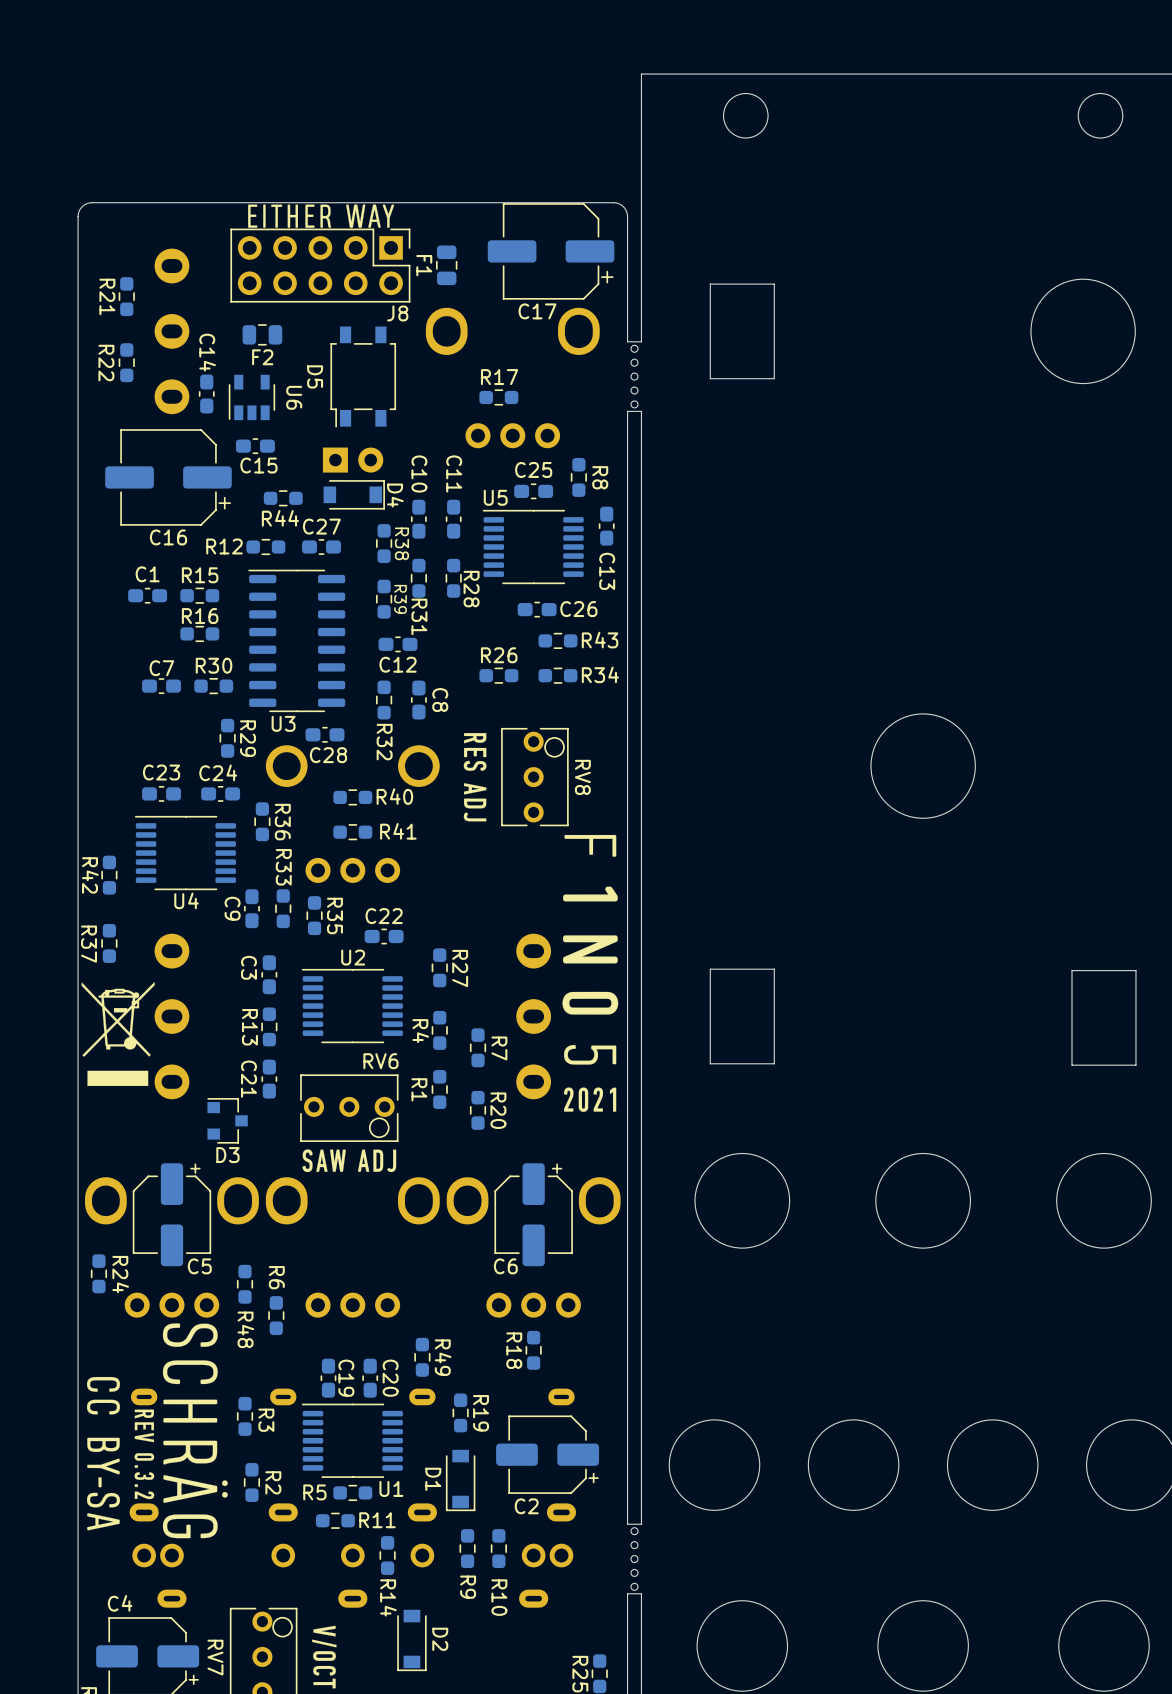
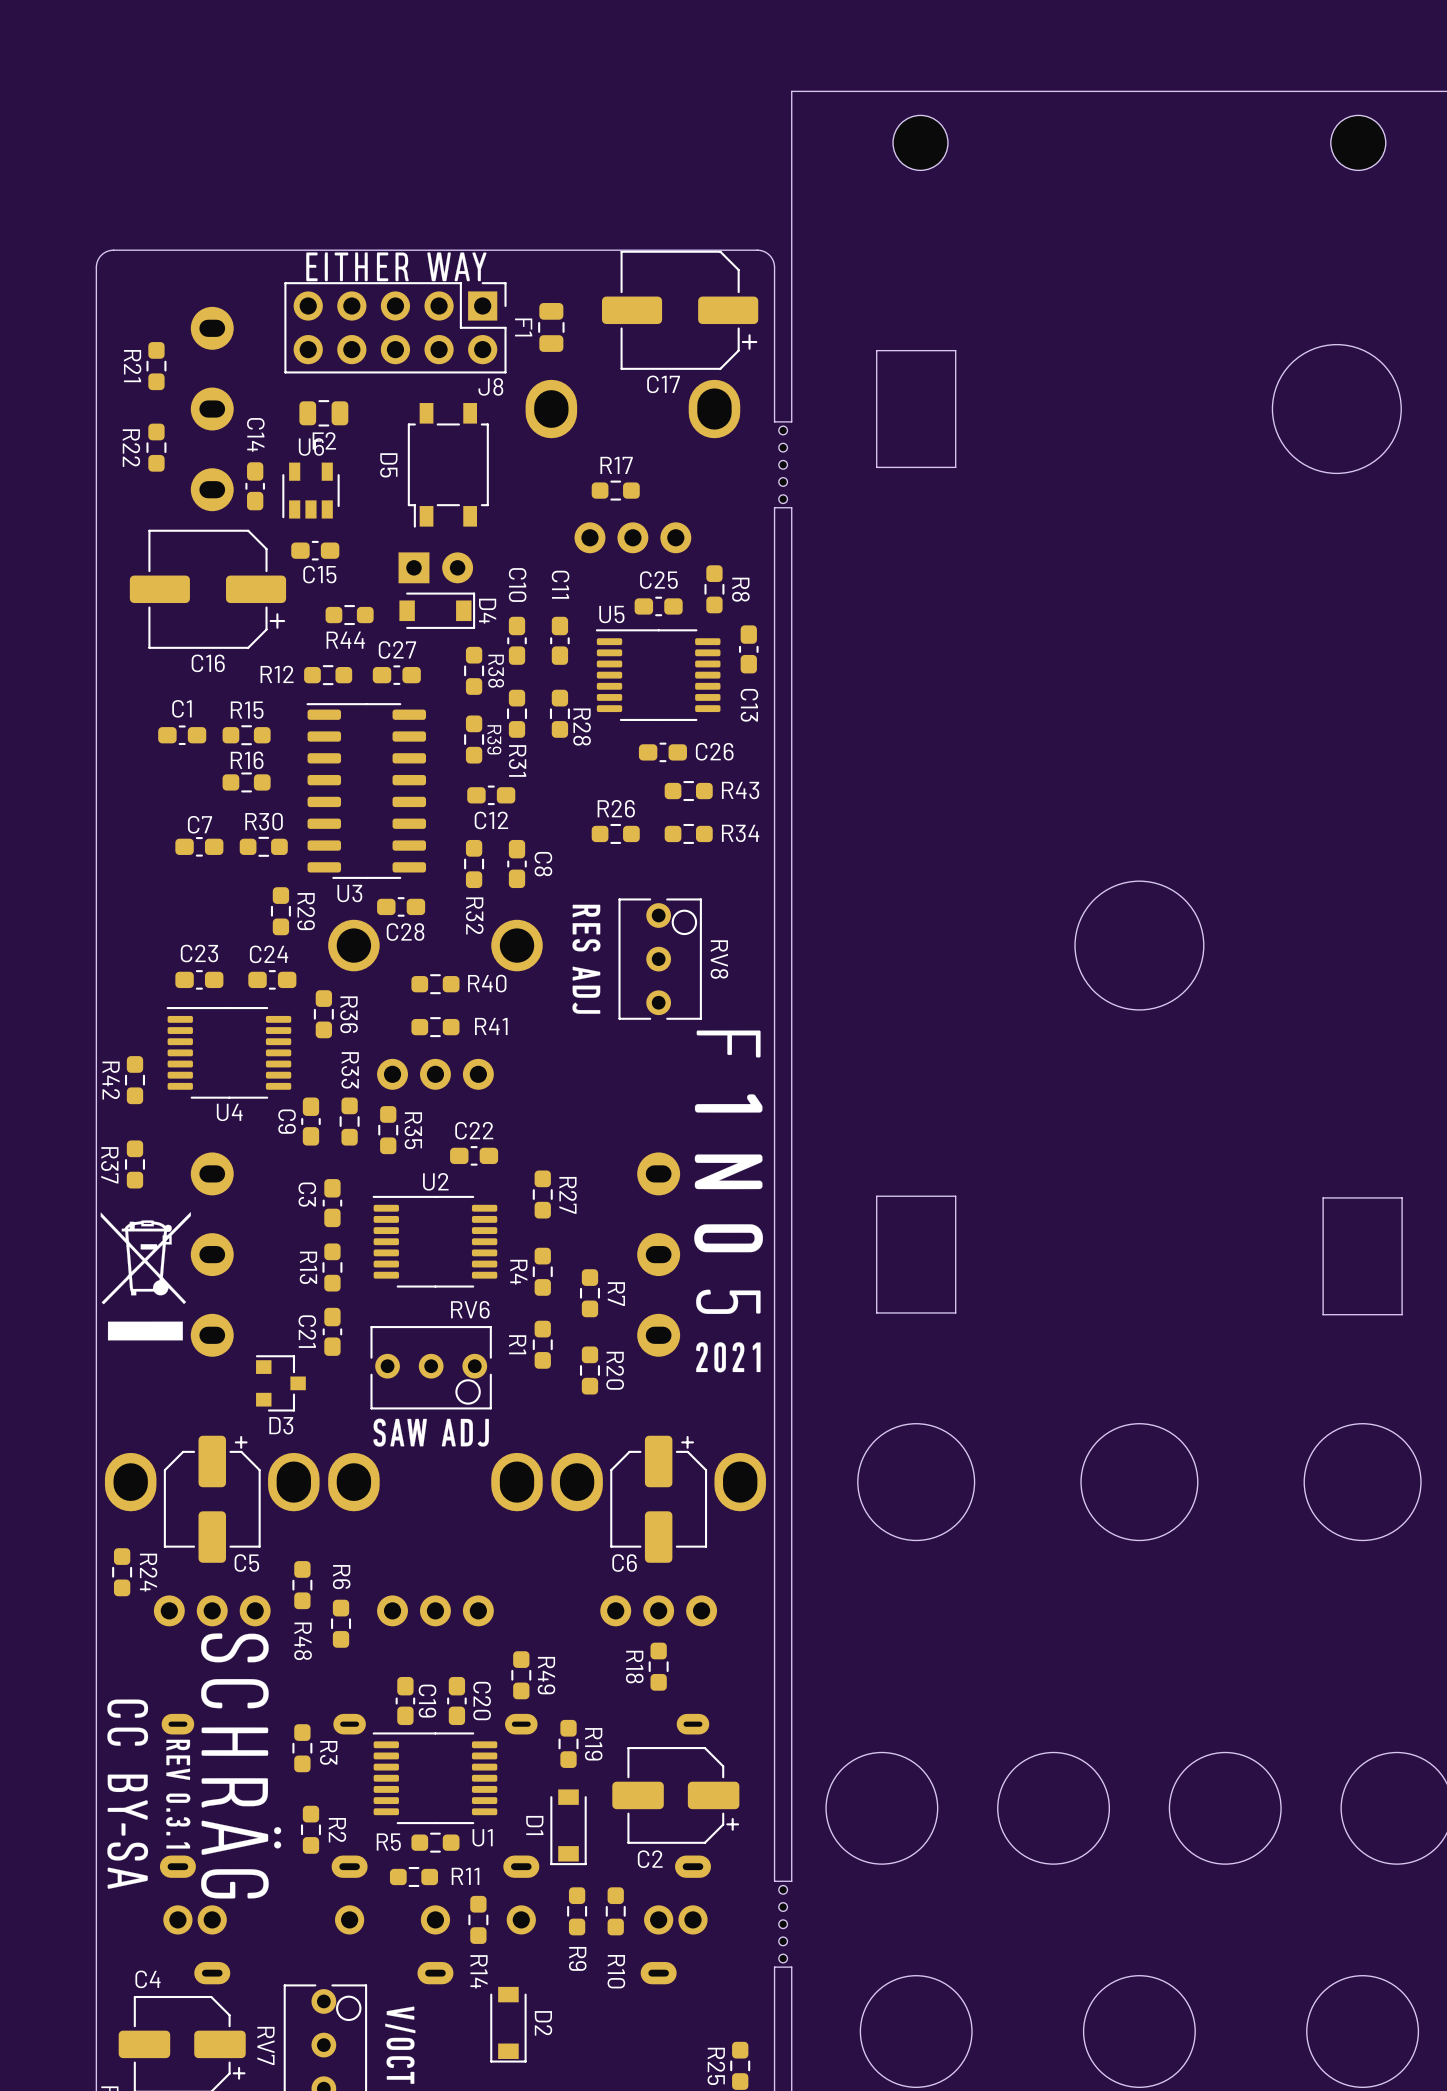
drawing shape: [81, 204, 619, 1689] -> [100, 252, 763, 2084]
U6 name rotation: 0° (294, 397) -> 90° counterclockwise (311, 447)
U6 name position: U6 (294, 397) -> U6 (311, 447)

